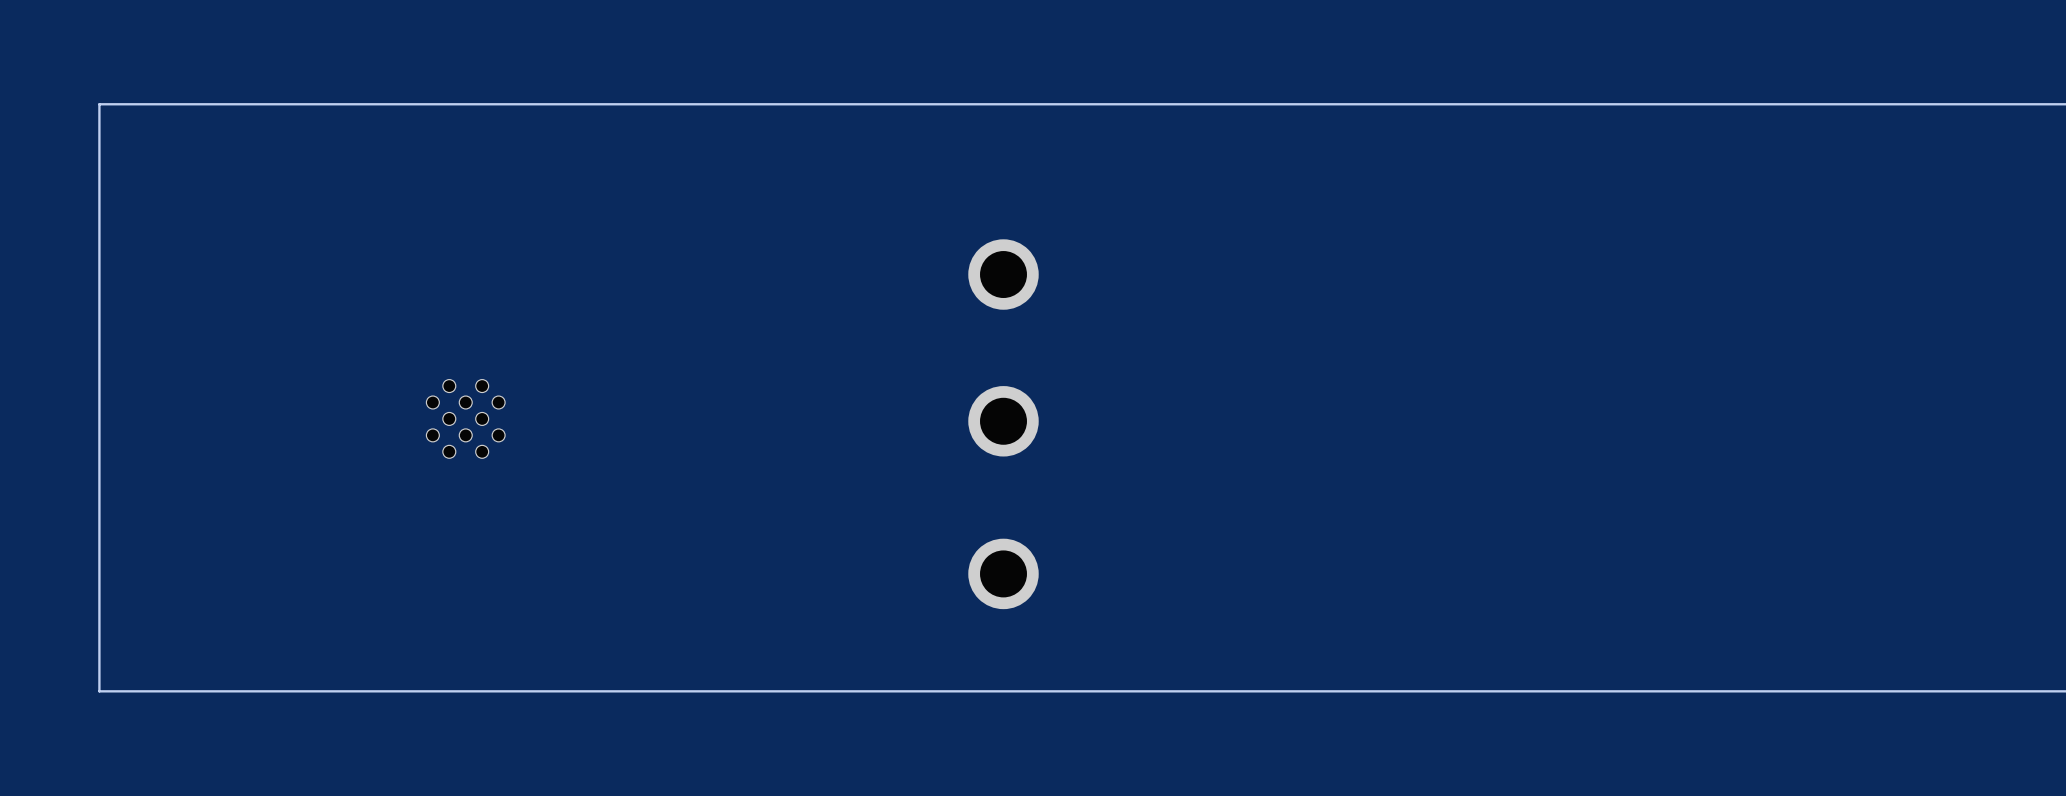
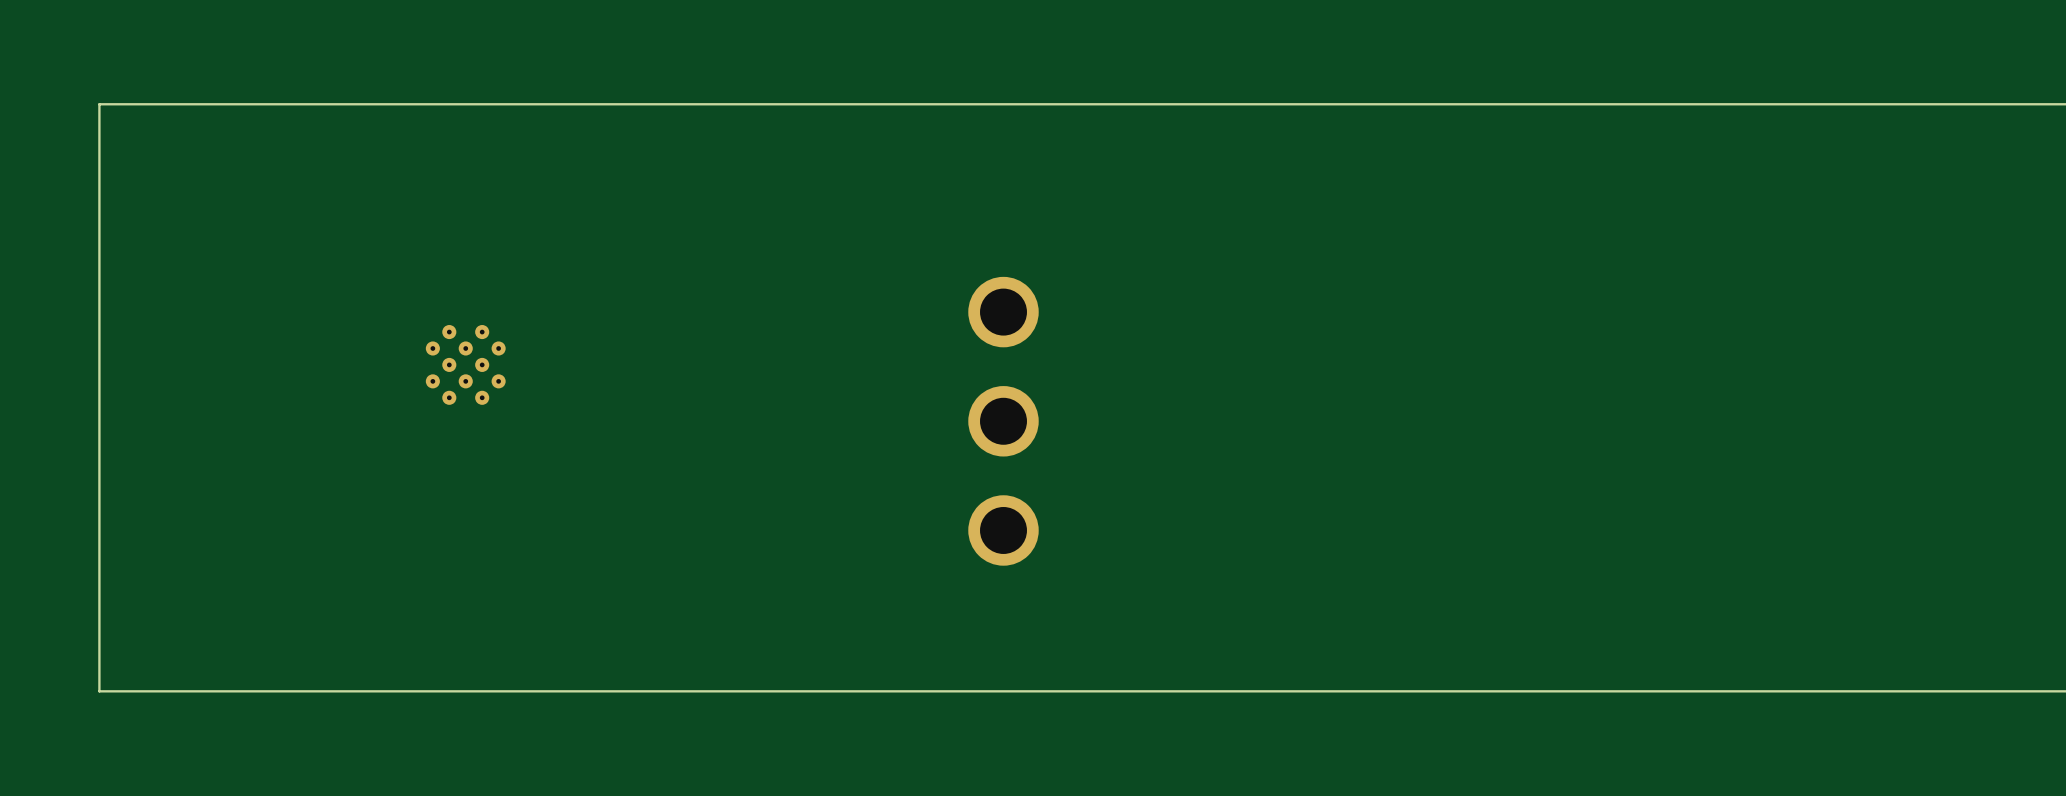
part position: (1003, 274) -> (1003, 312)
part: none -> (465, 364)
part: (465, 418) -> none
part position: (1003, 573) -> (1003, 530)

